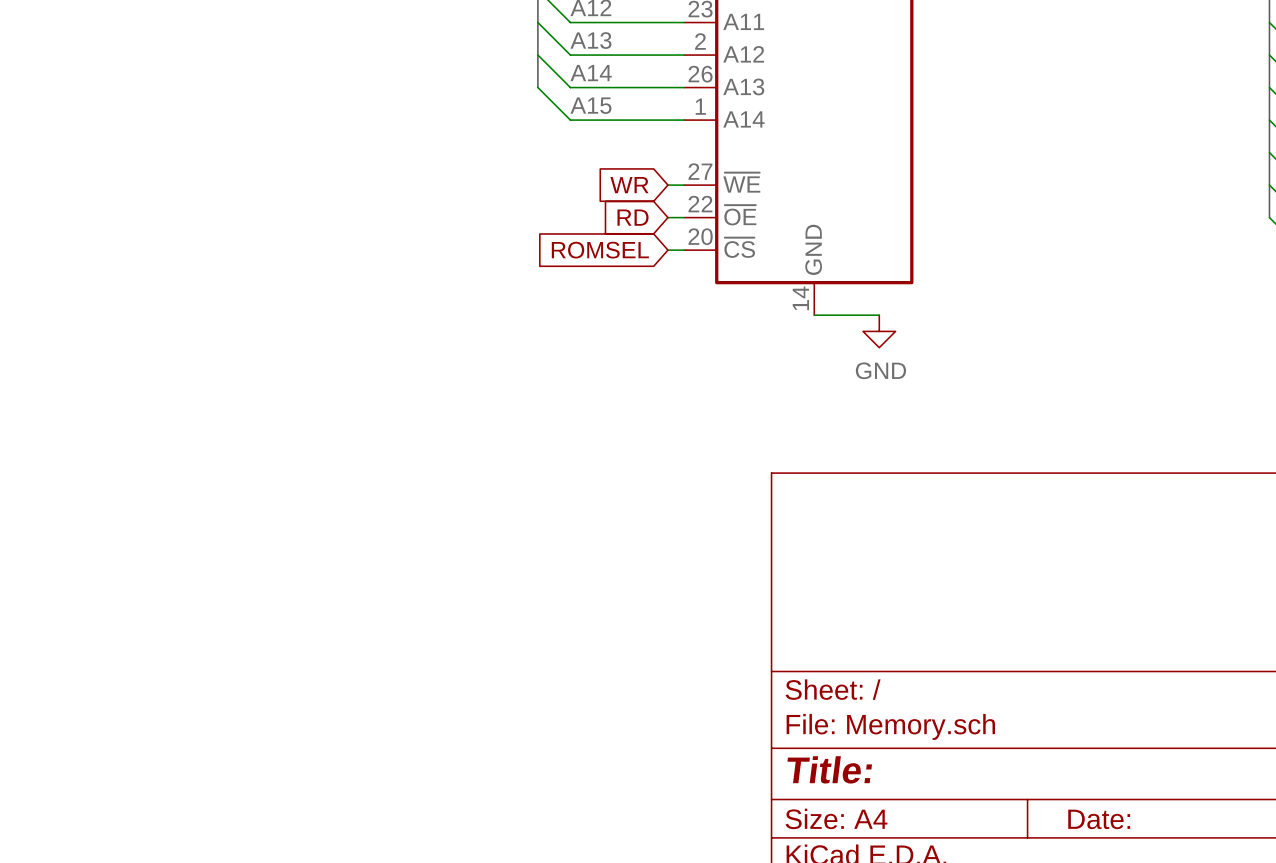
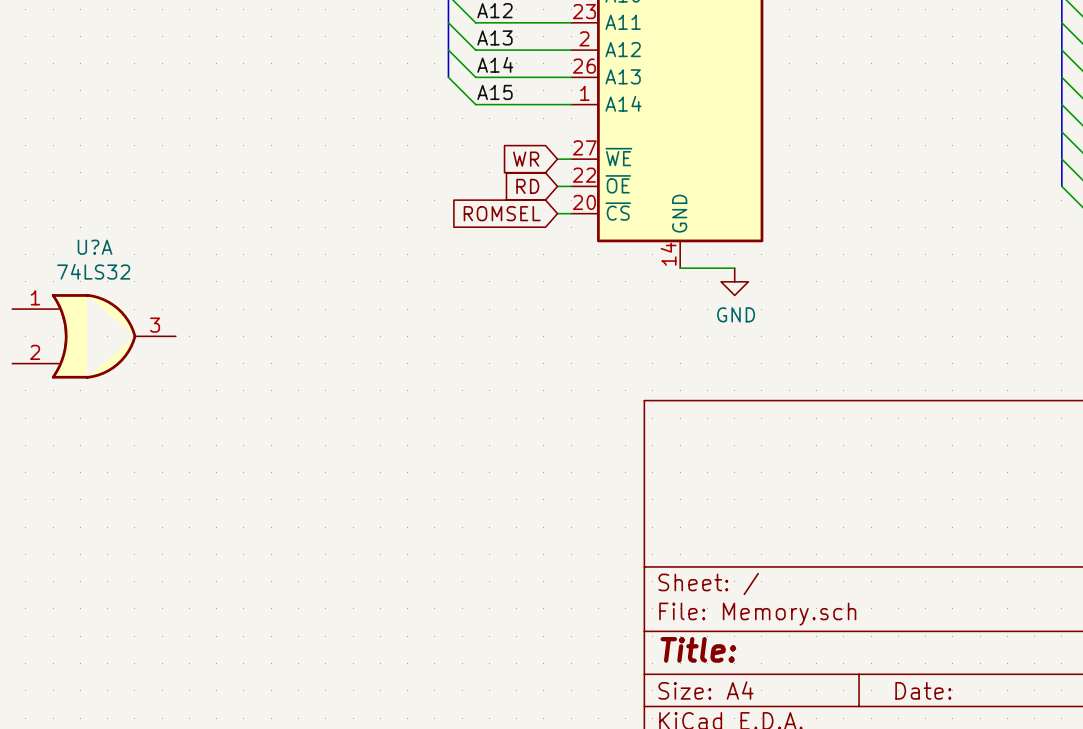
U?A: none -> 74LS32 (94, 336)

